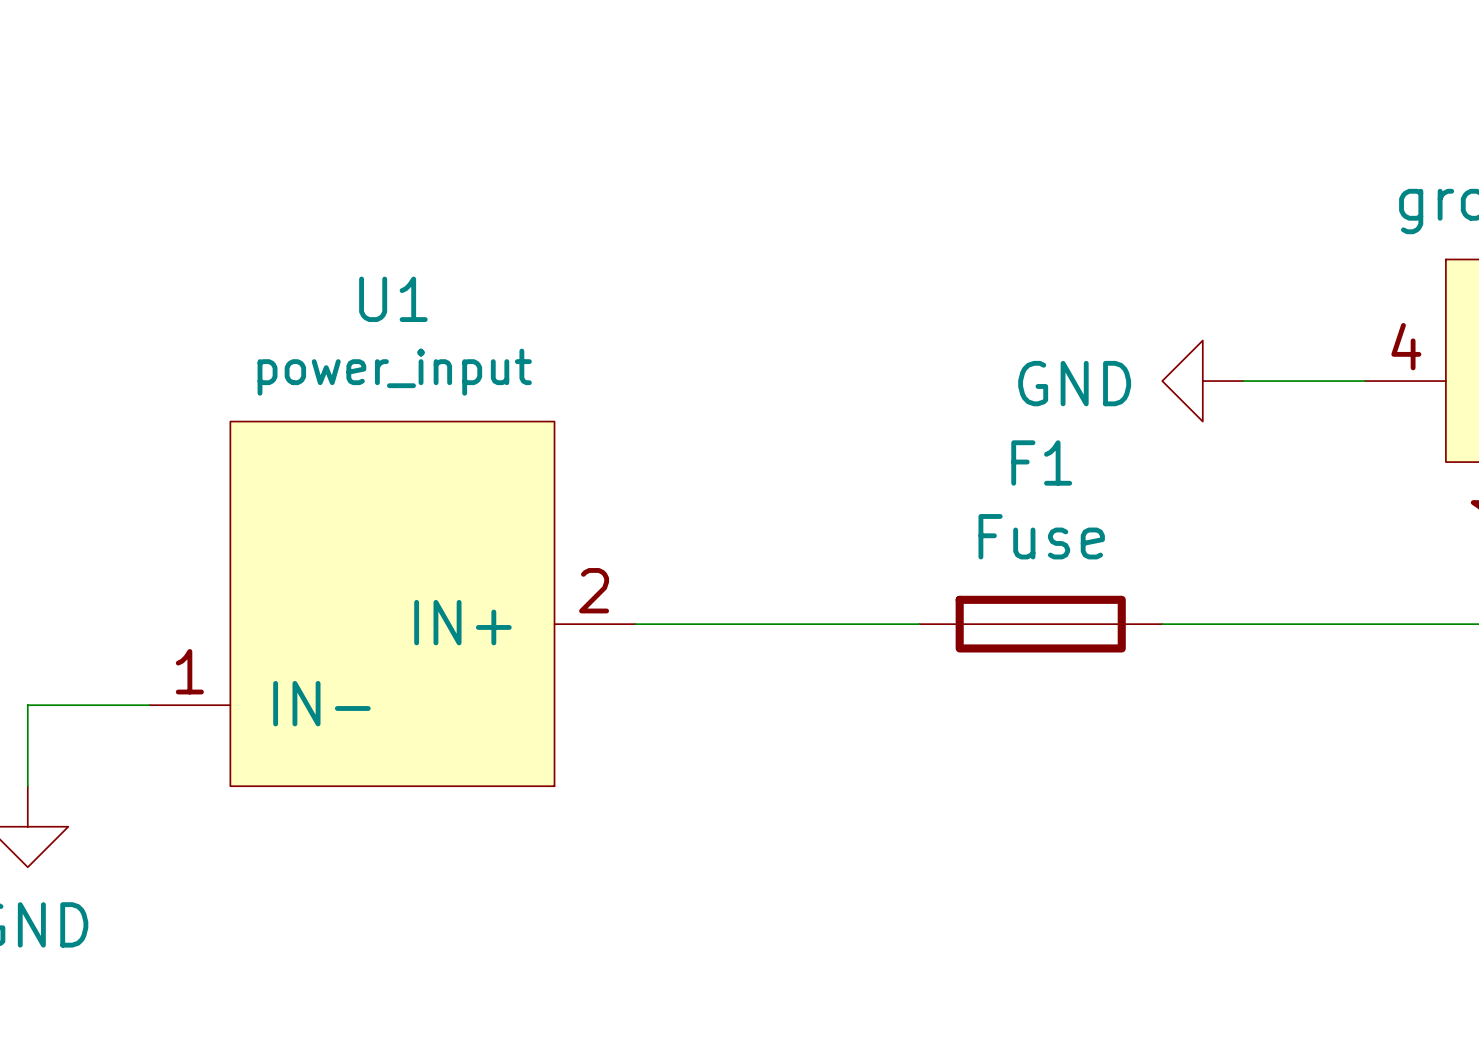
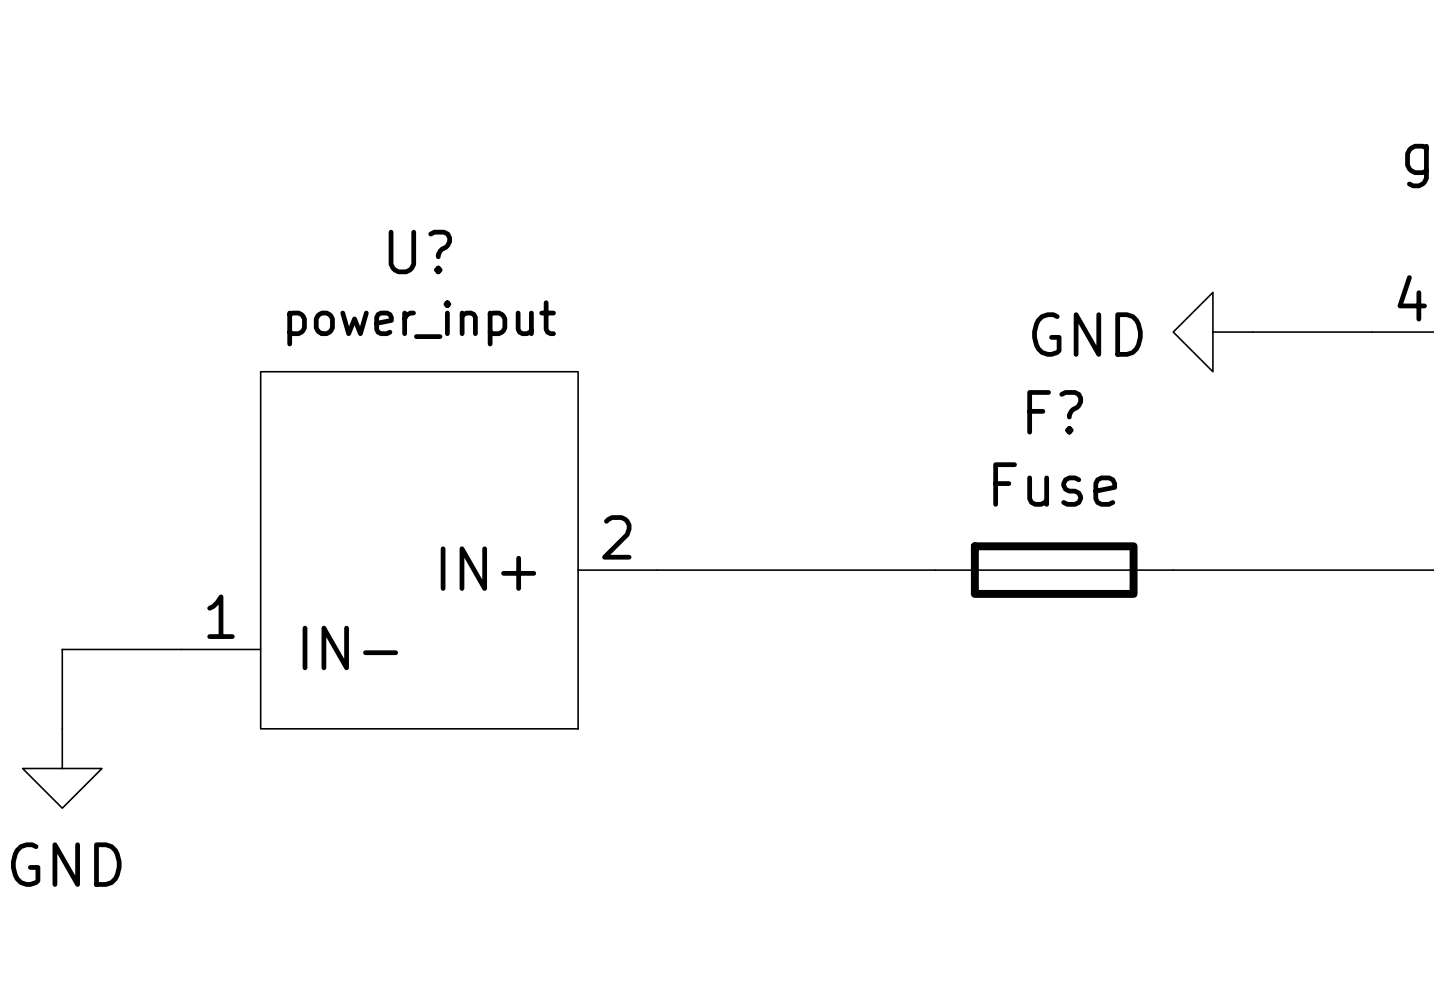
U1 name: U1 (393, 299) -> U? (420, 252)
F1 name: F1 (1041, 462) -> F? (1055, 412)

